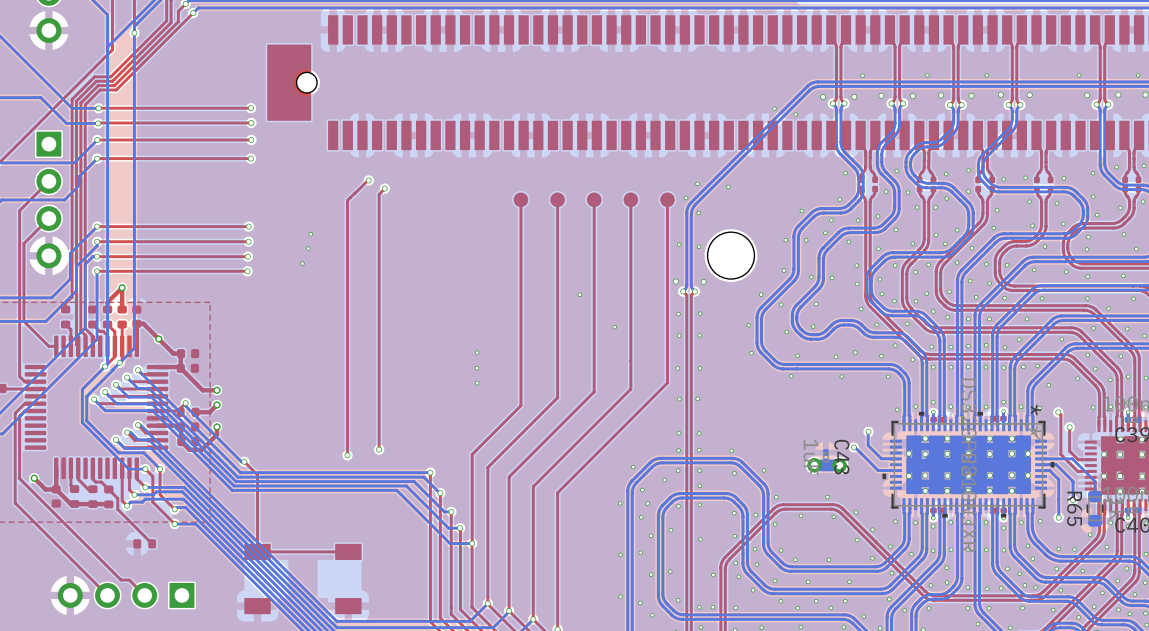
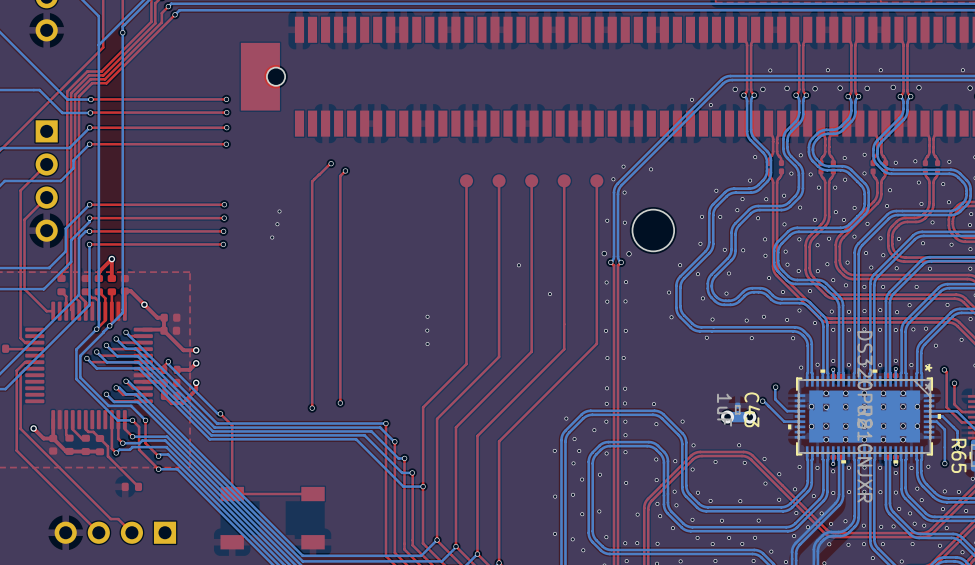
via: (946, 567) -> none
via: none -> (821, 513)
via: none -> (807, 527)
via: none -> (848, 544)
via: (904, 610) -> none

